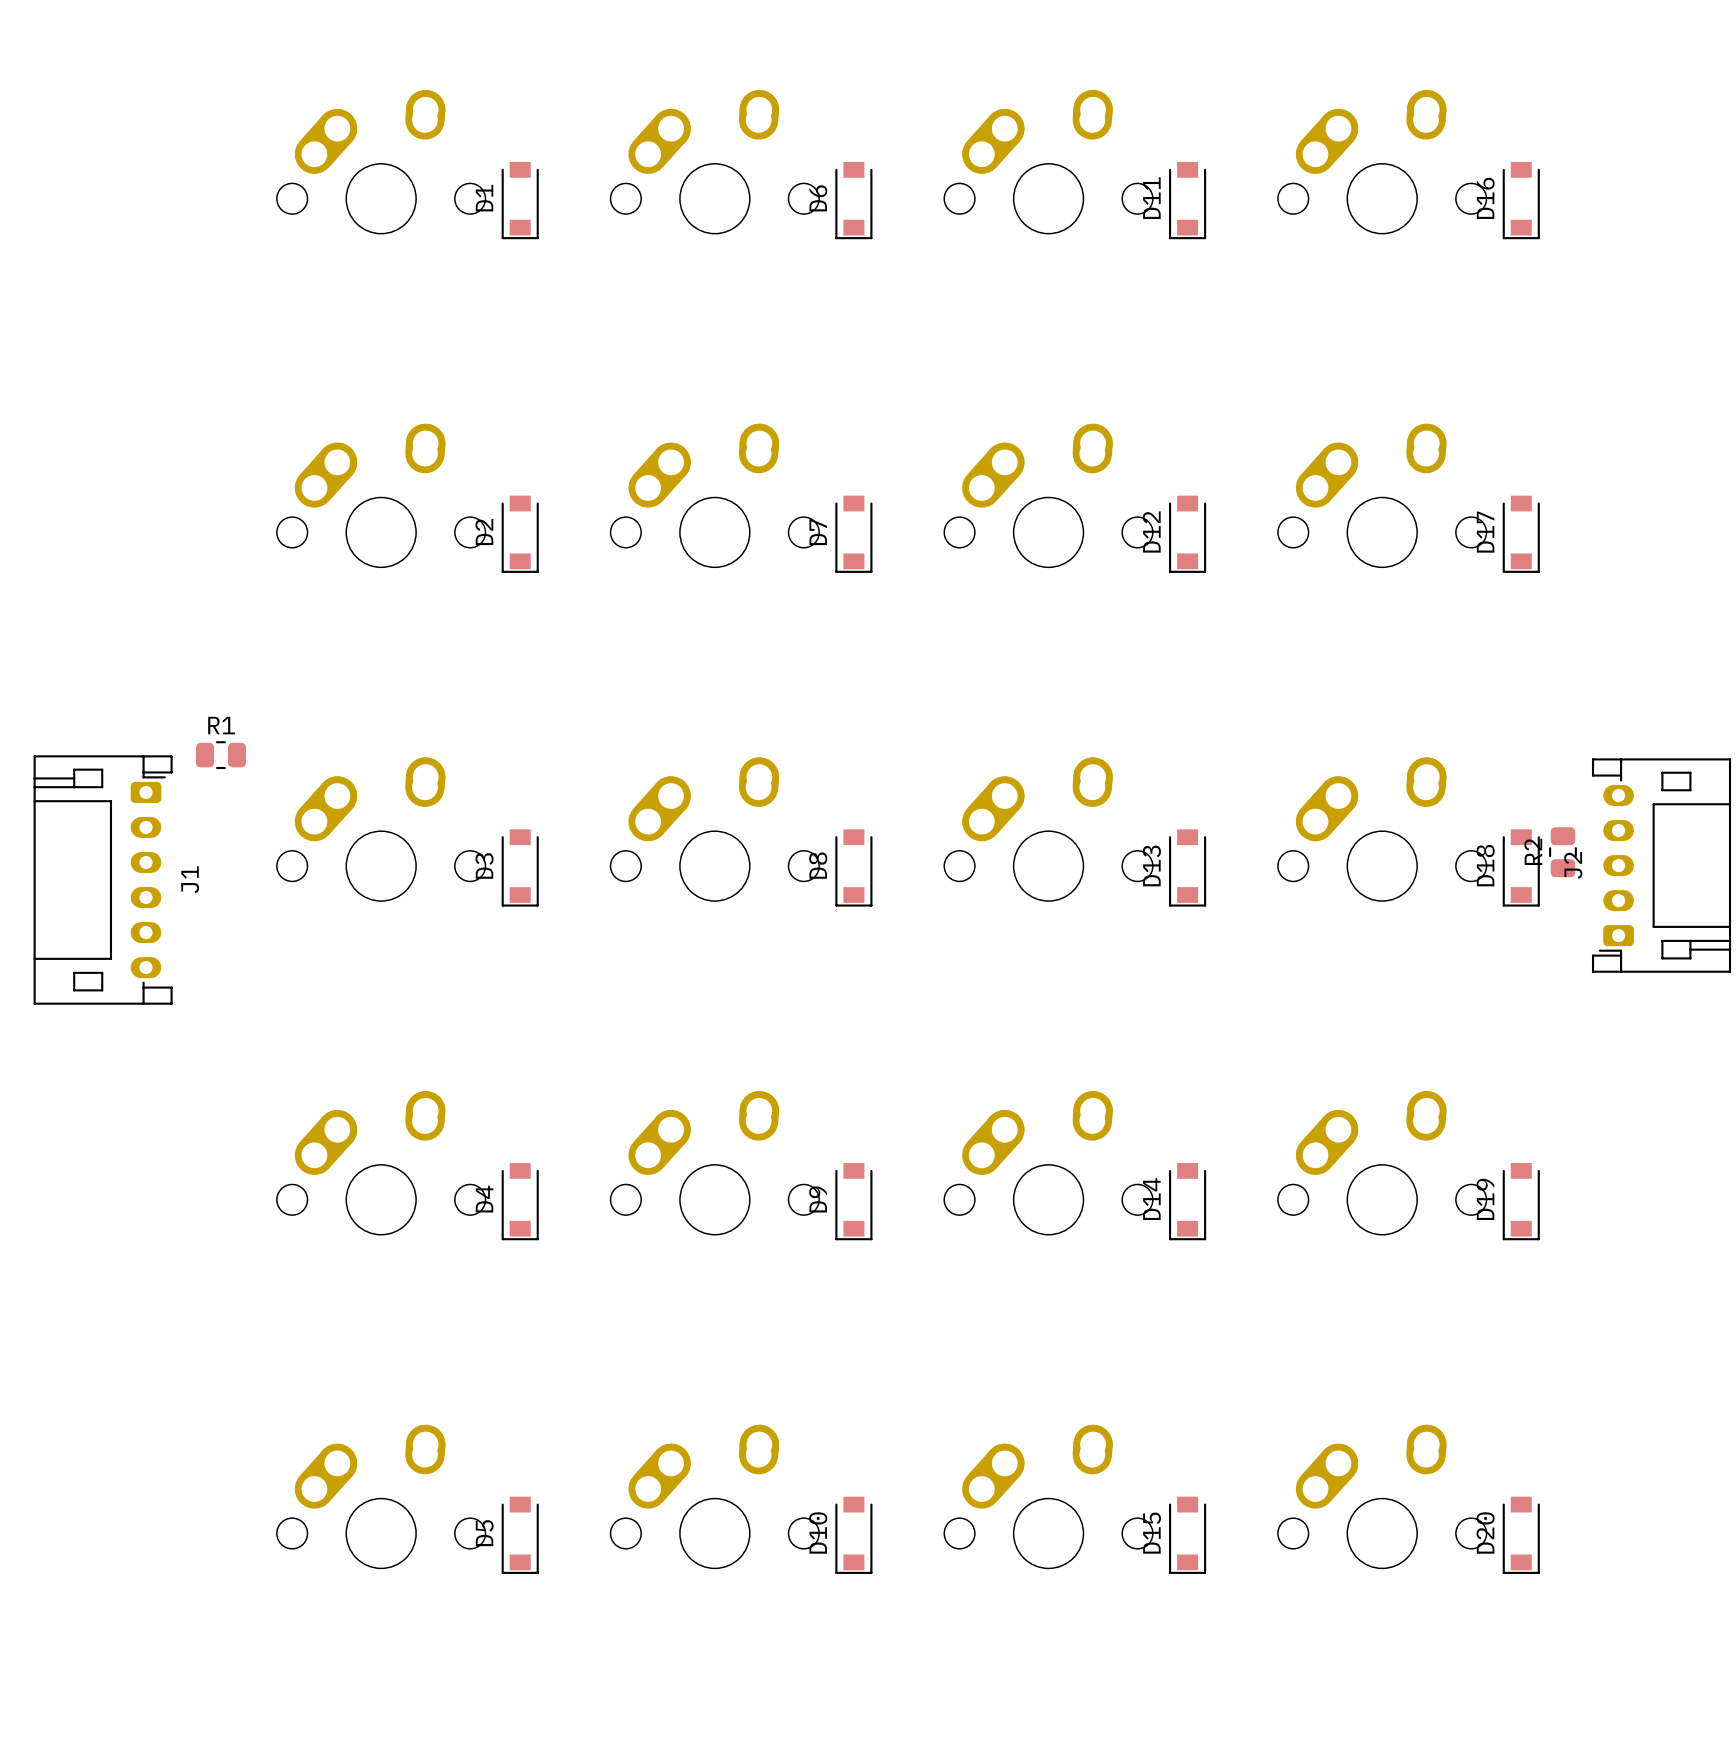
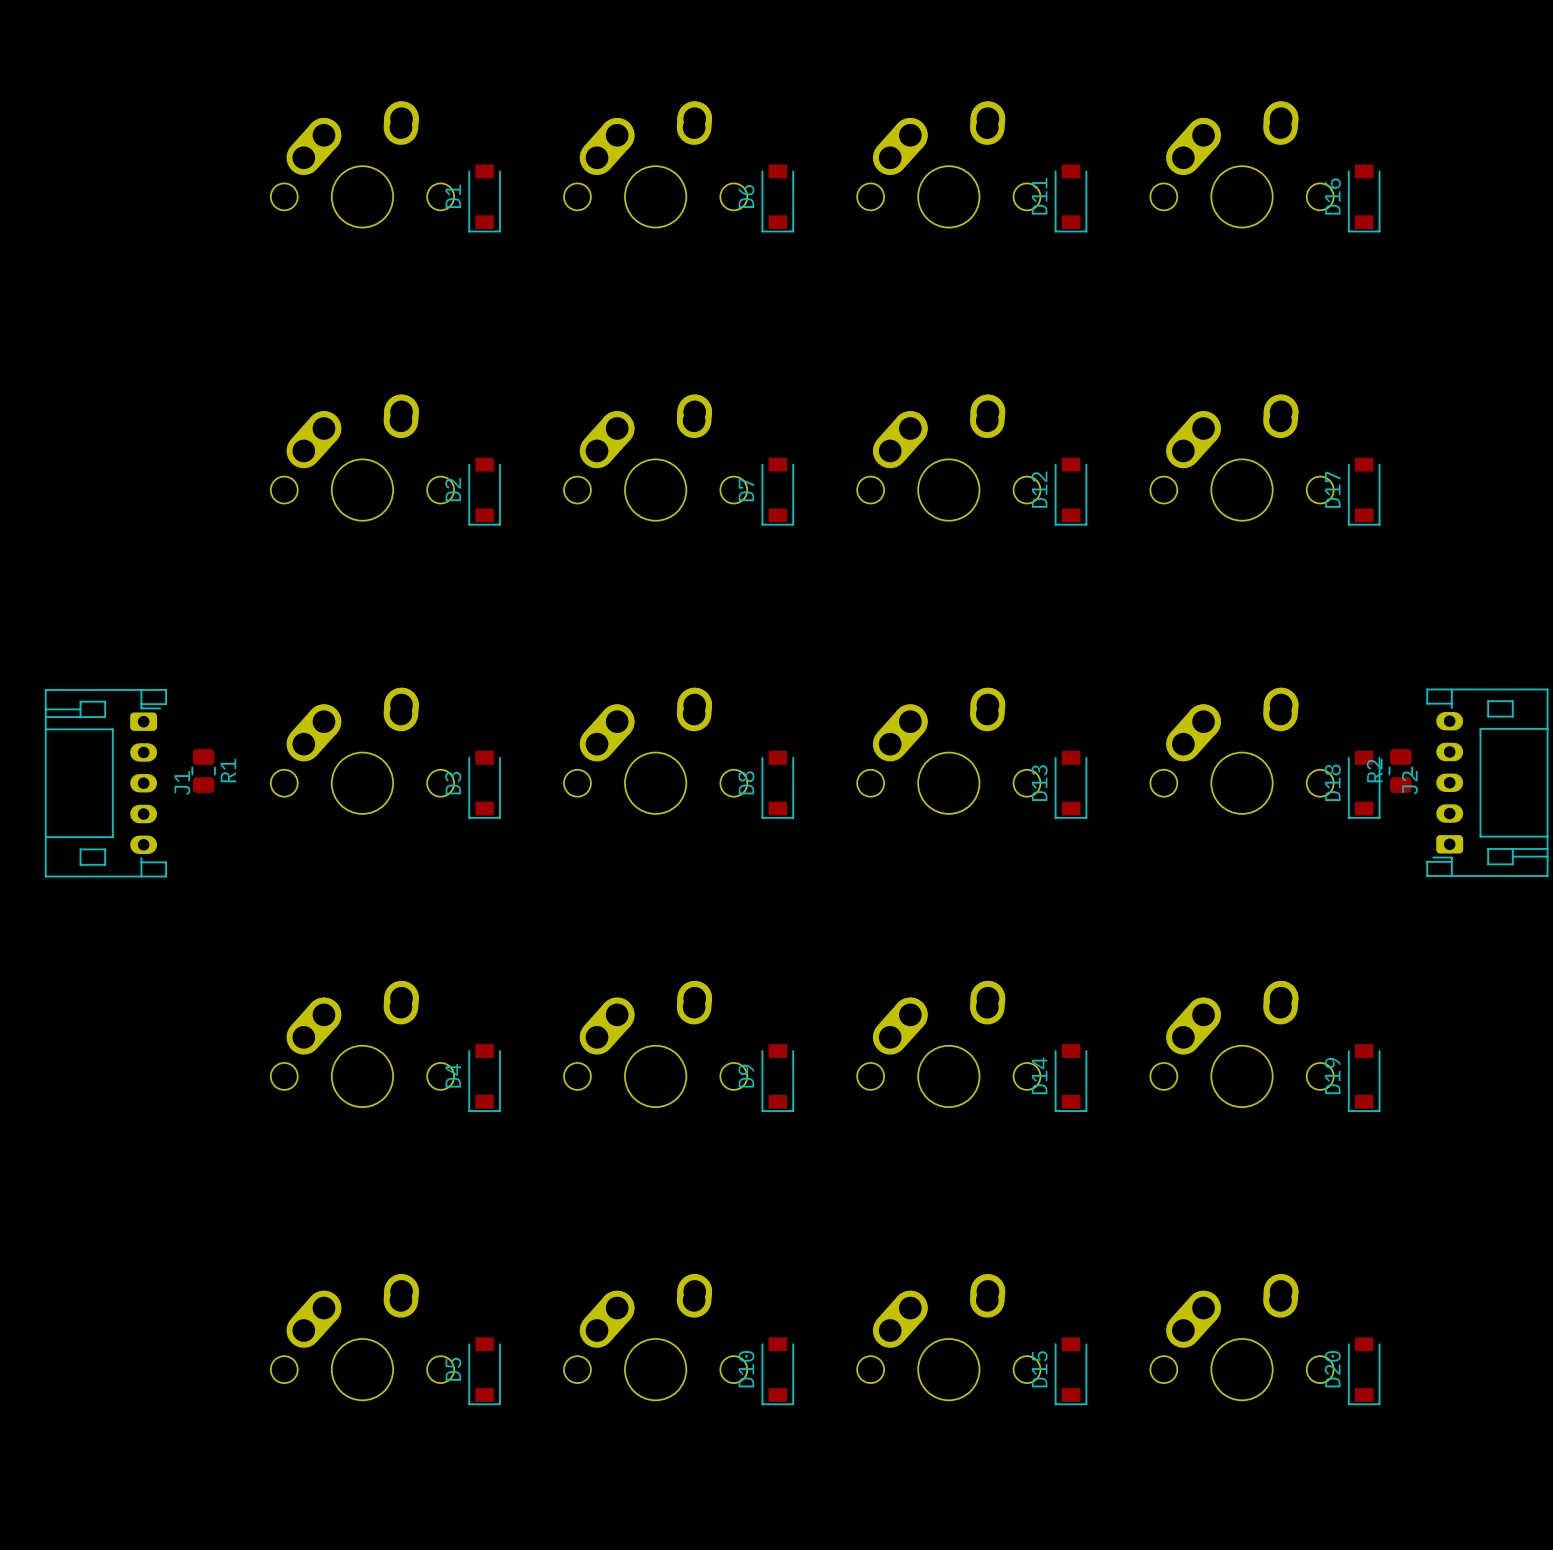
J1 footprint: [33, 755, 173, 1005] -> [44, 689, 168, 878]
R1 rotation: 0° (220, 755) -> 90° clockwise (203, 771)
R1 position: (220, 755) -> (203, 771)

